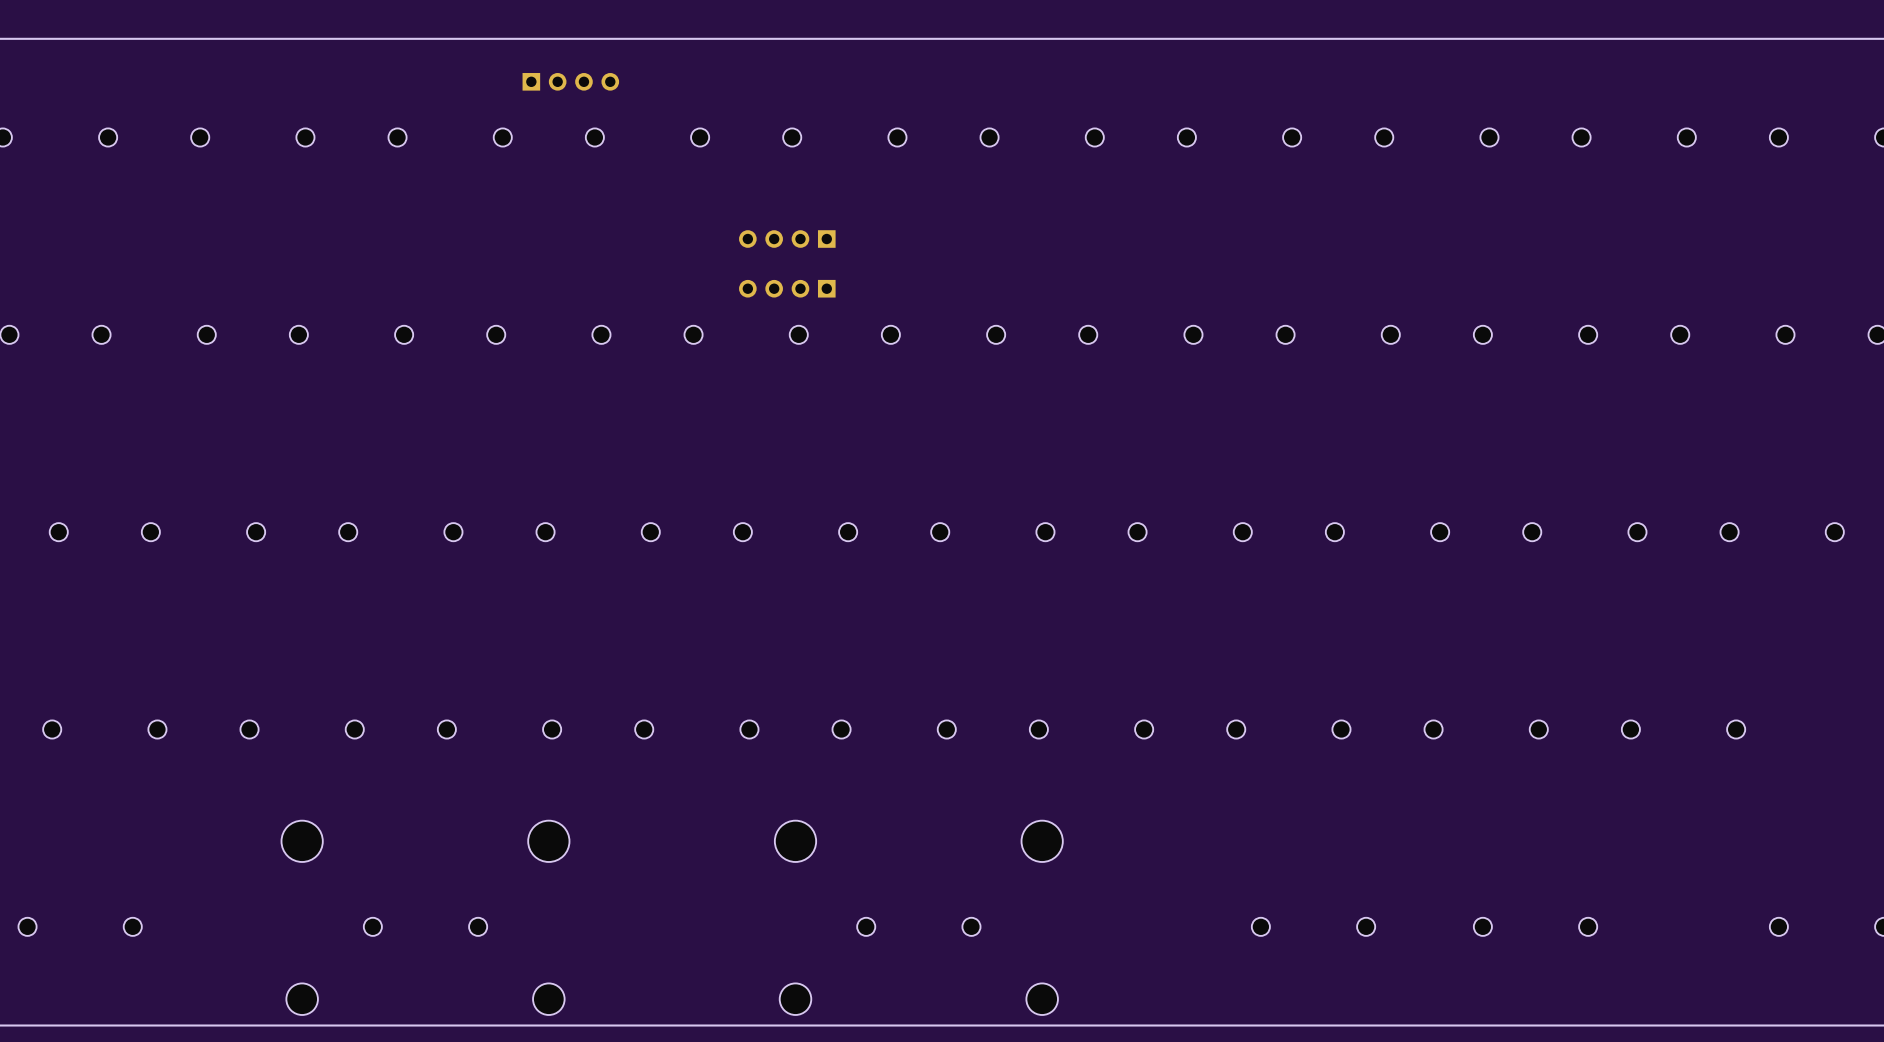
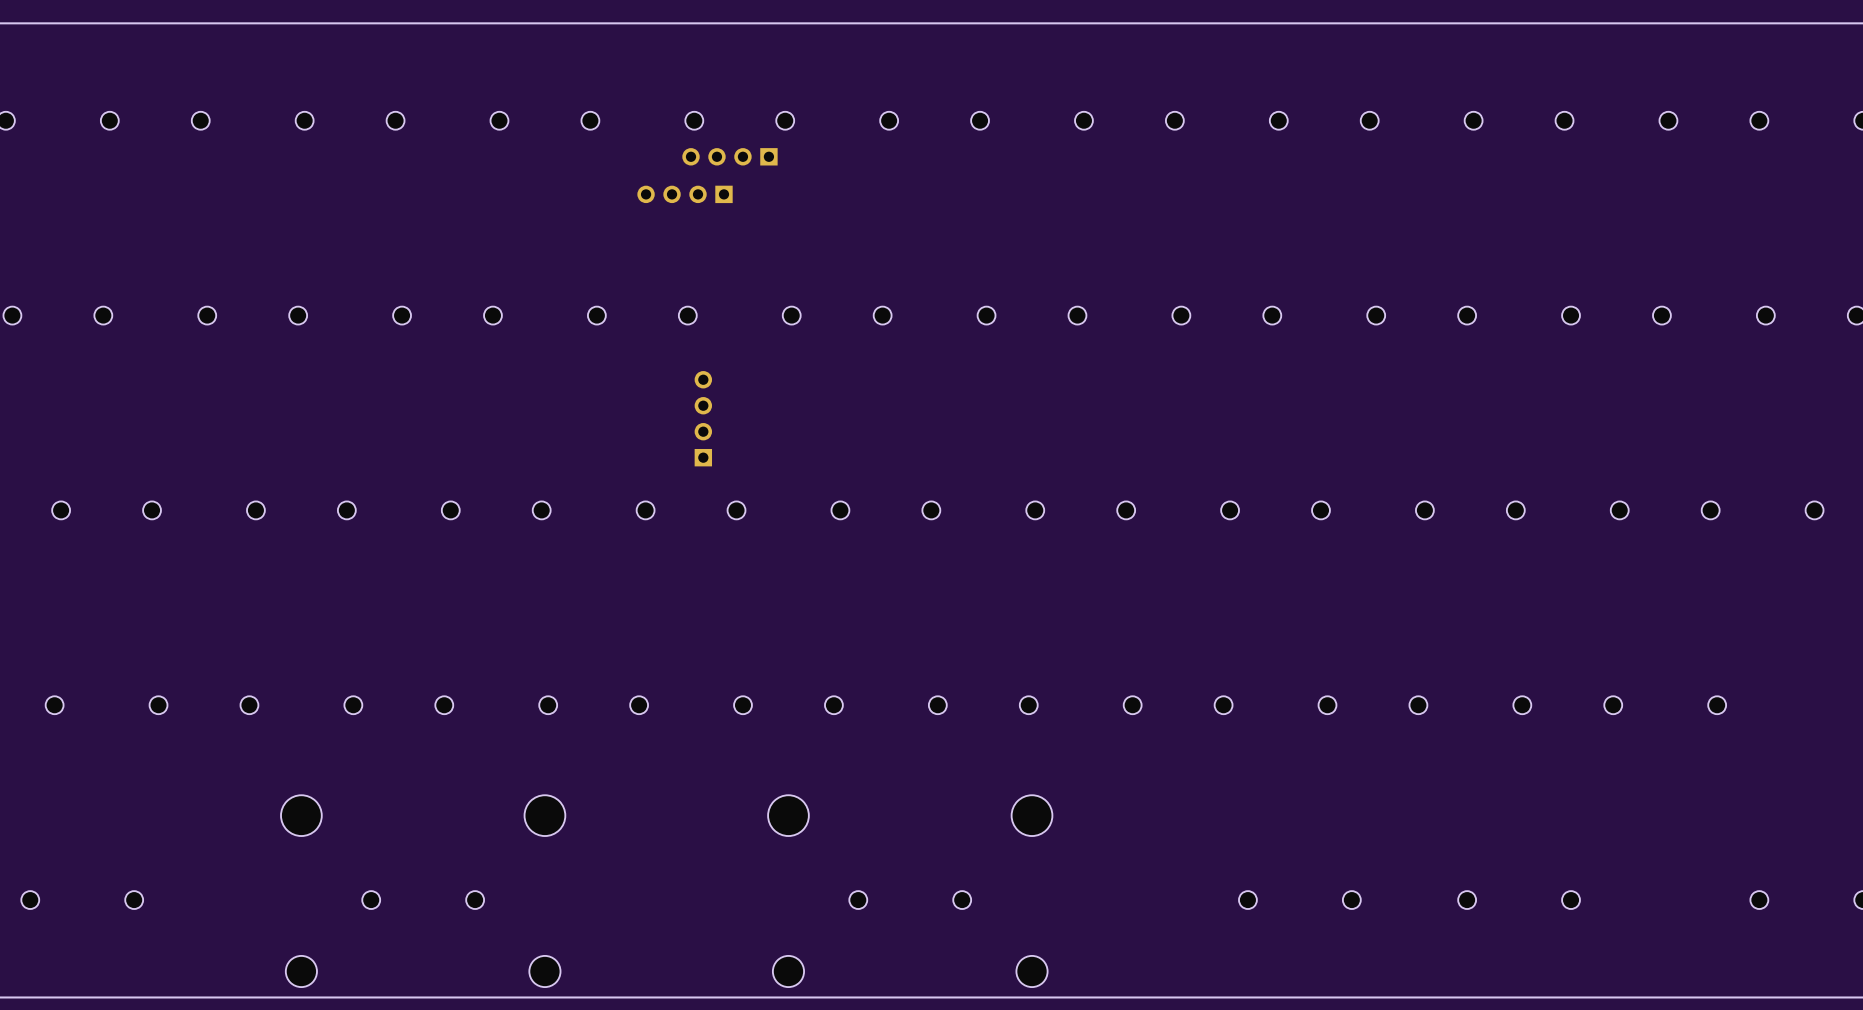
part: (570, 81) -> none
part: none -> (729, 156)
part: none -> (685, 194)
part: (787, 239) -> none
part: (787, 288) -> none
part: none -> (703, 418)

